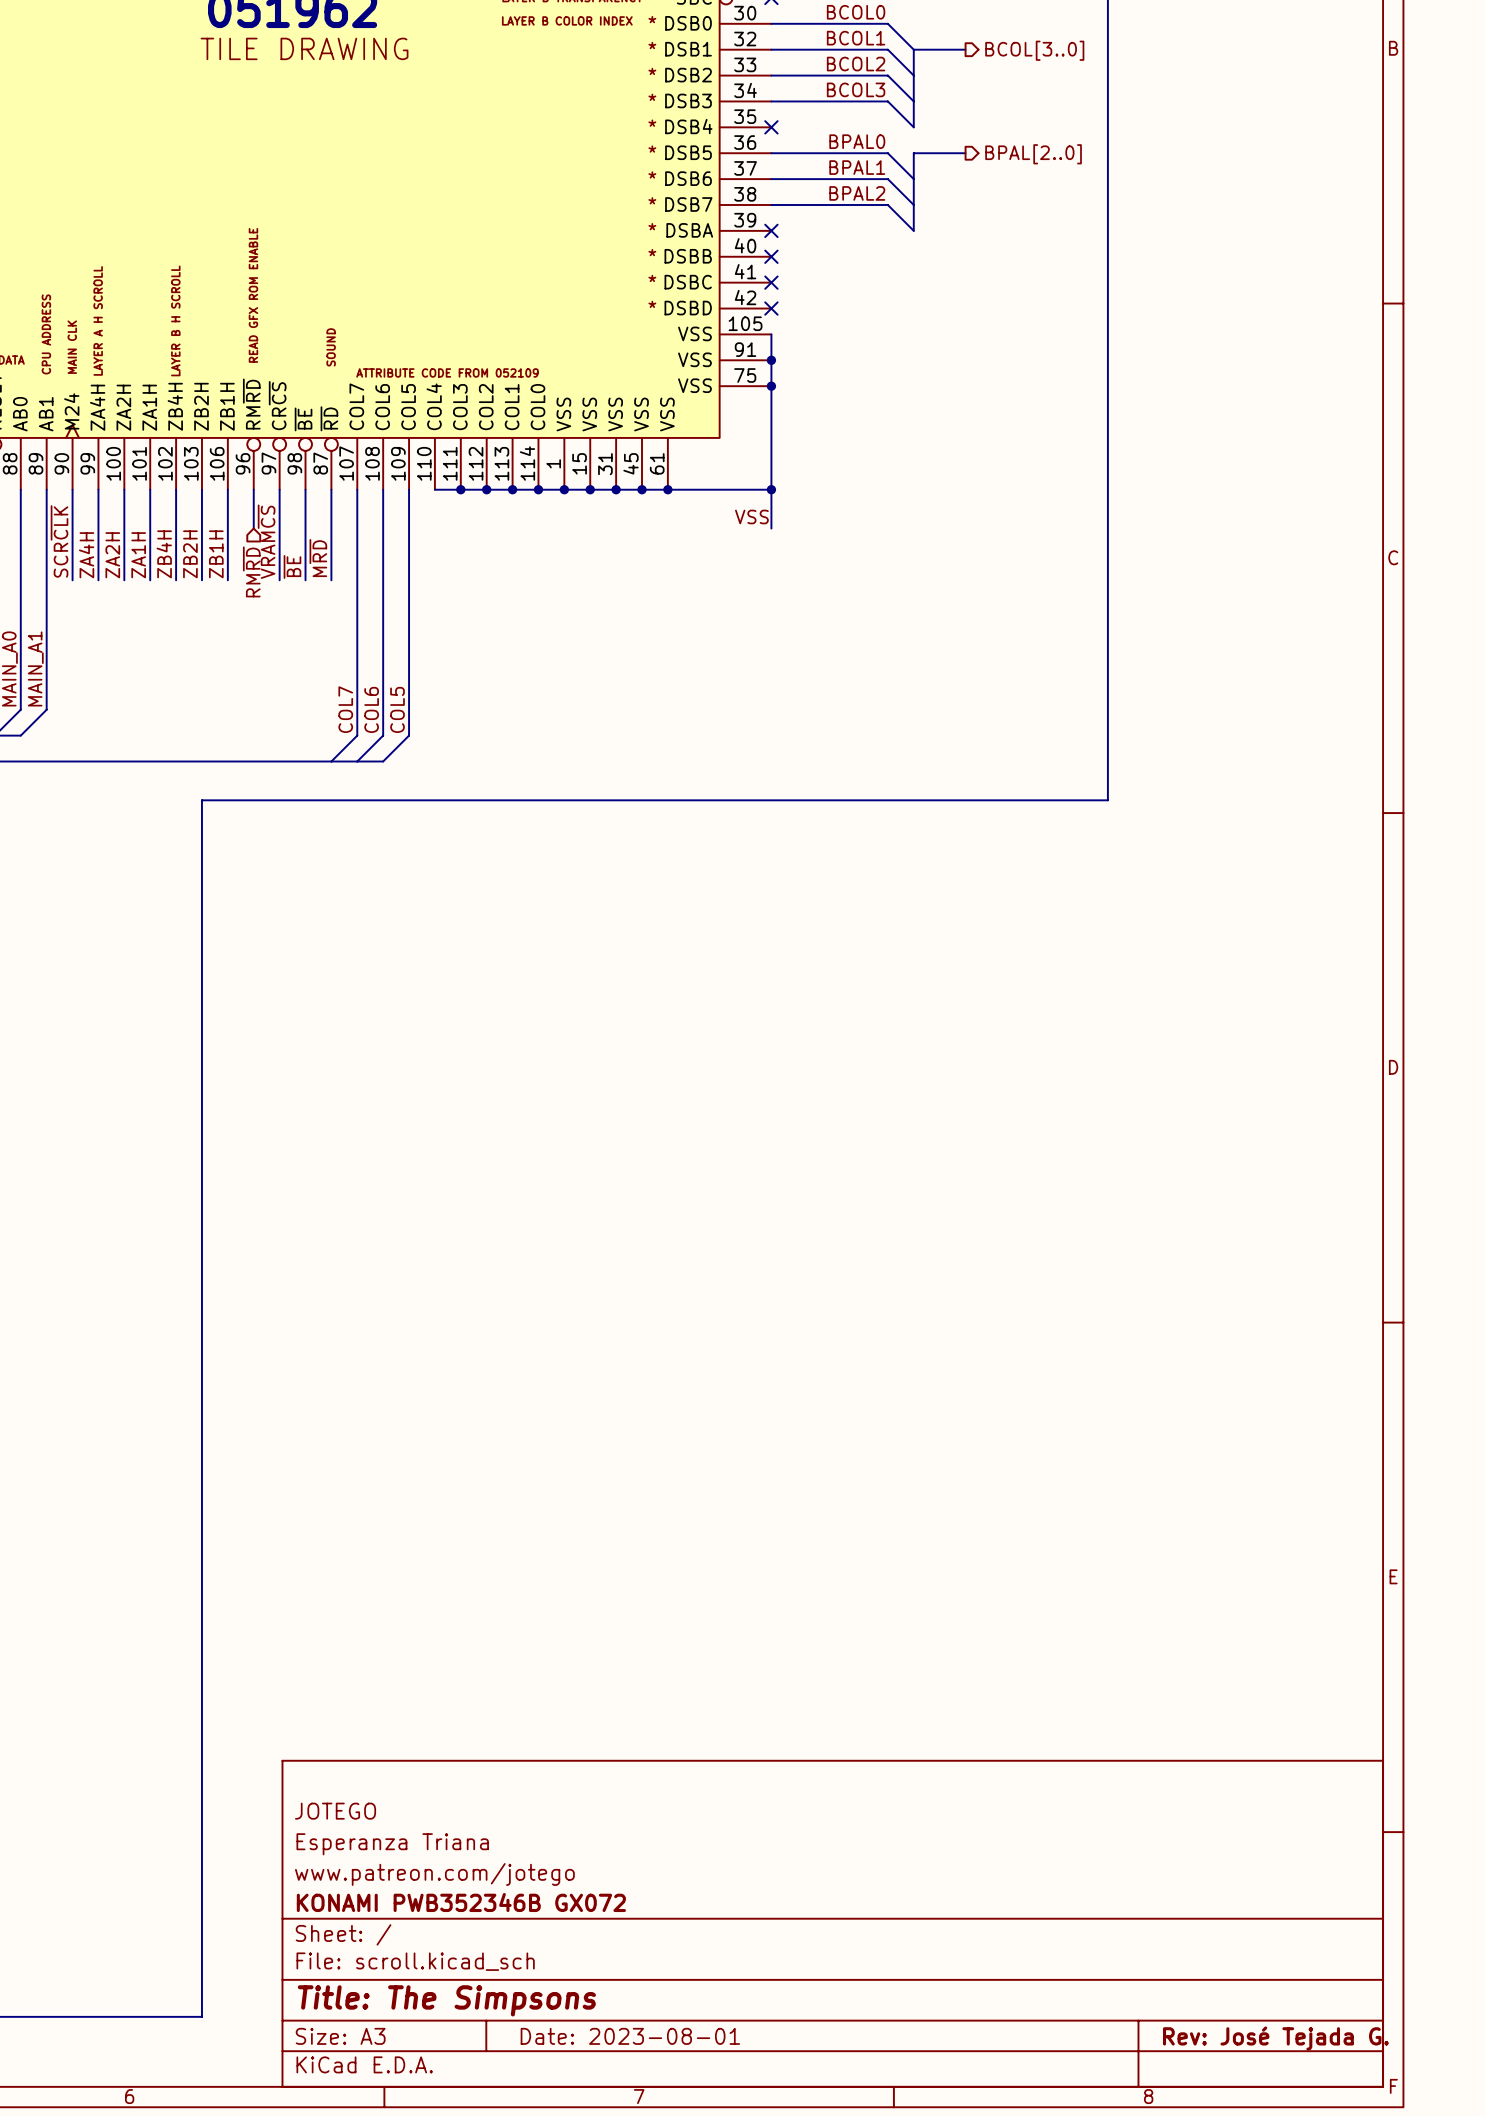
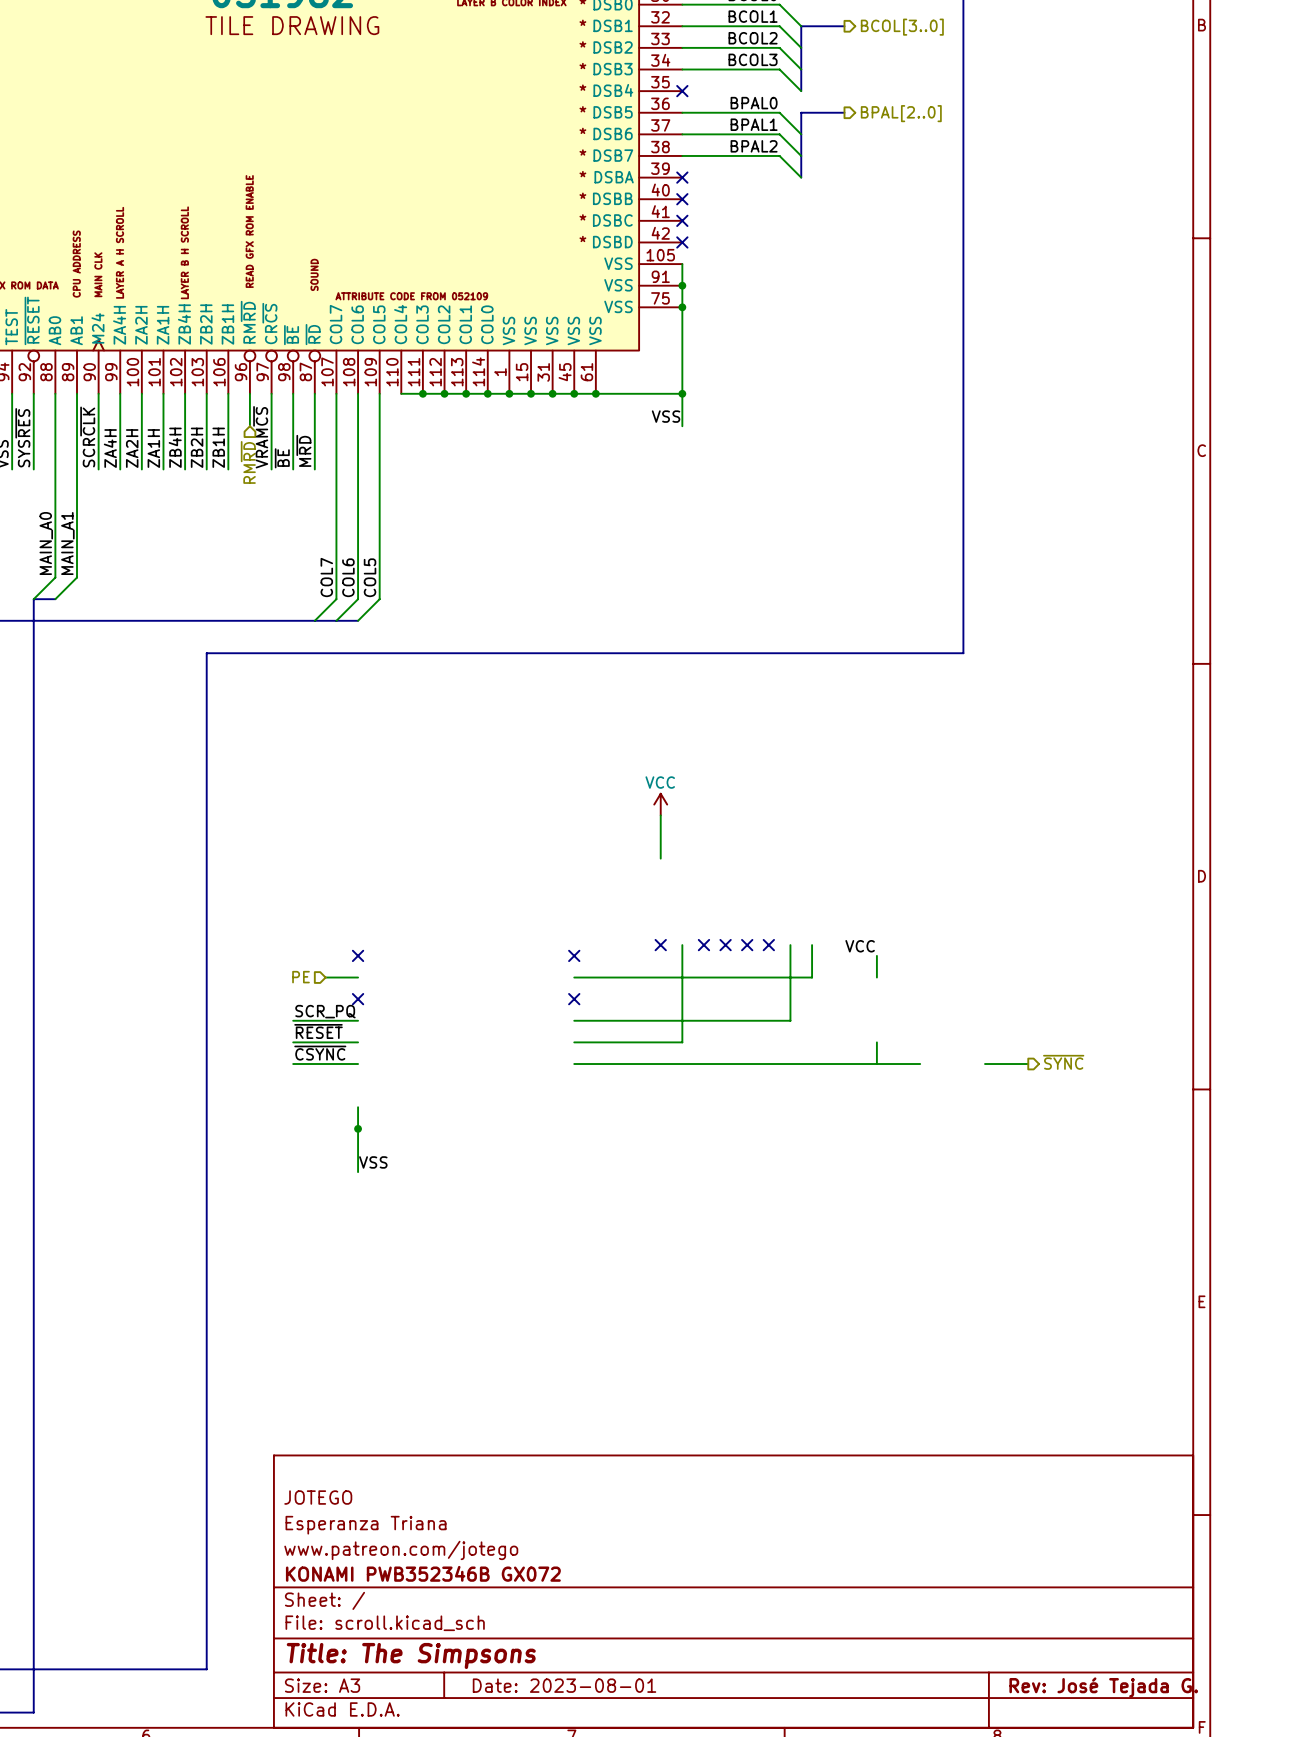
power symbol: none -> VCC (660, 804)
wire: none -> (660, 815) (660, 858)
no-connect mark: none -> (660, 945)
wire: none -> (682, 945) (682, 1042) (574, 1042)
no-connect mark: none -> (703, 945)
no-connect mark: none -> (725, 945)
no-connect mark: none -> (747, 945)
no-connect mark: none -> (768, 945)
wire: none -> (790, 945) (790, 1020) (574, 1020)
wire: none -> (812, 945) (812, 977) (574, 977)
label: none -> VCC (860, 946)
no-connect mark: none -> (358, 955)
no-connect mark: none -> (574, 955)
wire: none -> (876, 955) (876, 977)
hierarchical label: none -> PE (301, 977)
wire: none -> (325, 977) (358, 977)
no-connect mark: none -> (358, 999)
no-connect mark: none -> (574, 999)
label: none -> SCR_PQ (325, 1011)
wire: none -> (293, 1020) (358, 1020)
label: none -> ~{RESET} (318, 1031)
wire: none -> (293, 1042) (358, 1042)
wire: none -> (876, 1042) (876, 1064)
label: none -> ~{CSYNC} (320, 1053)
hierarchical label: none -> ~{SYNC} (1063, 1062)
wire: none -> (293, 1064) (358, 1064)
wire: none -> (574, 1064) (920, 1064)
wire: none -> (985, 1064) (1028, 1064)
wire: none -> (358, 1107) (358, 1172)
junction: none -> (358, 1128)
label: none -> VSS (373, 1162)

